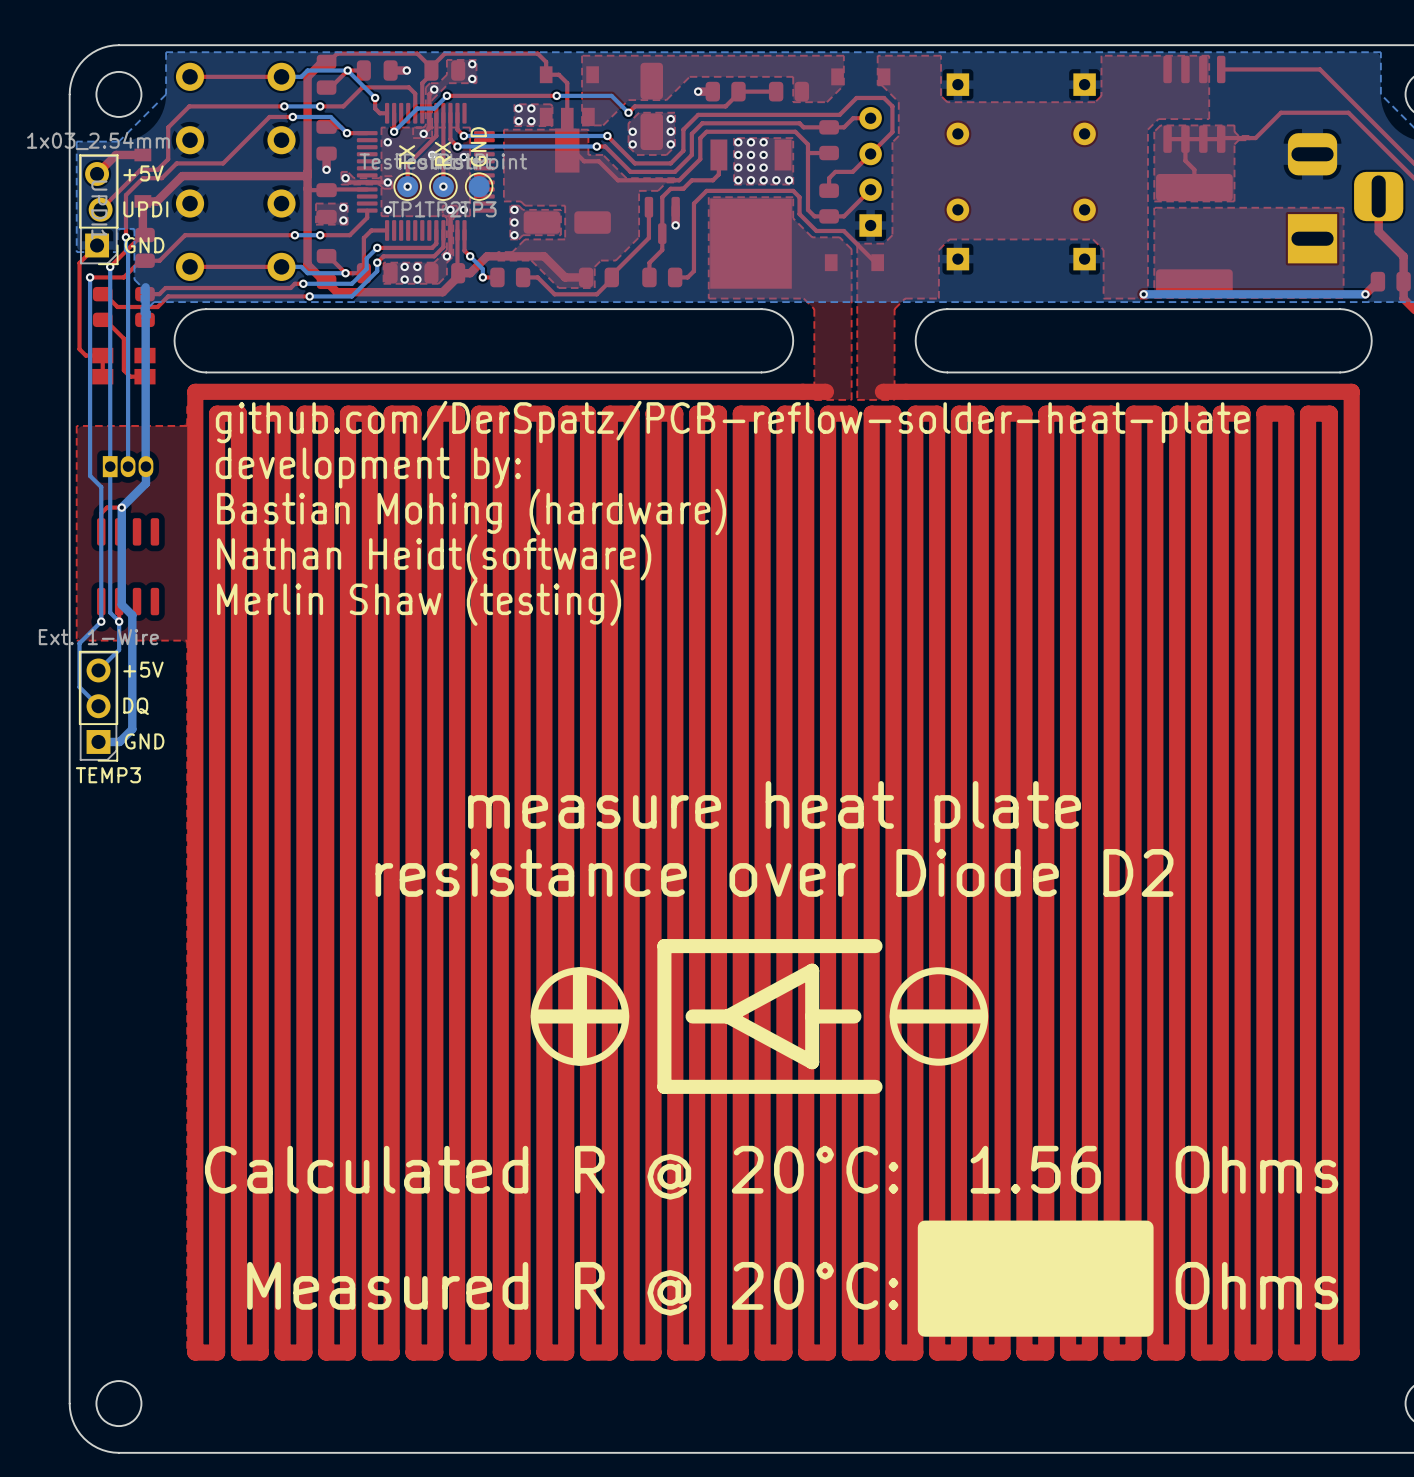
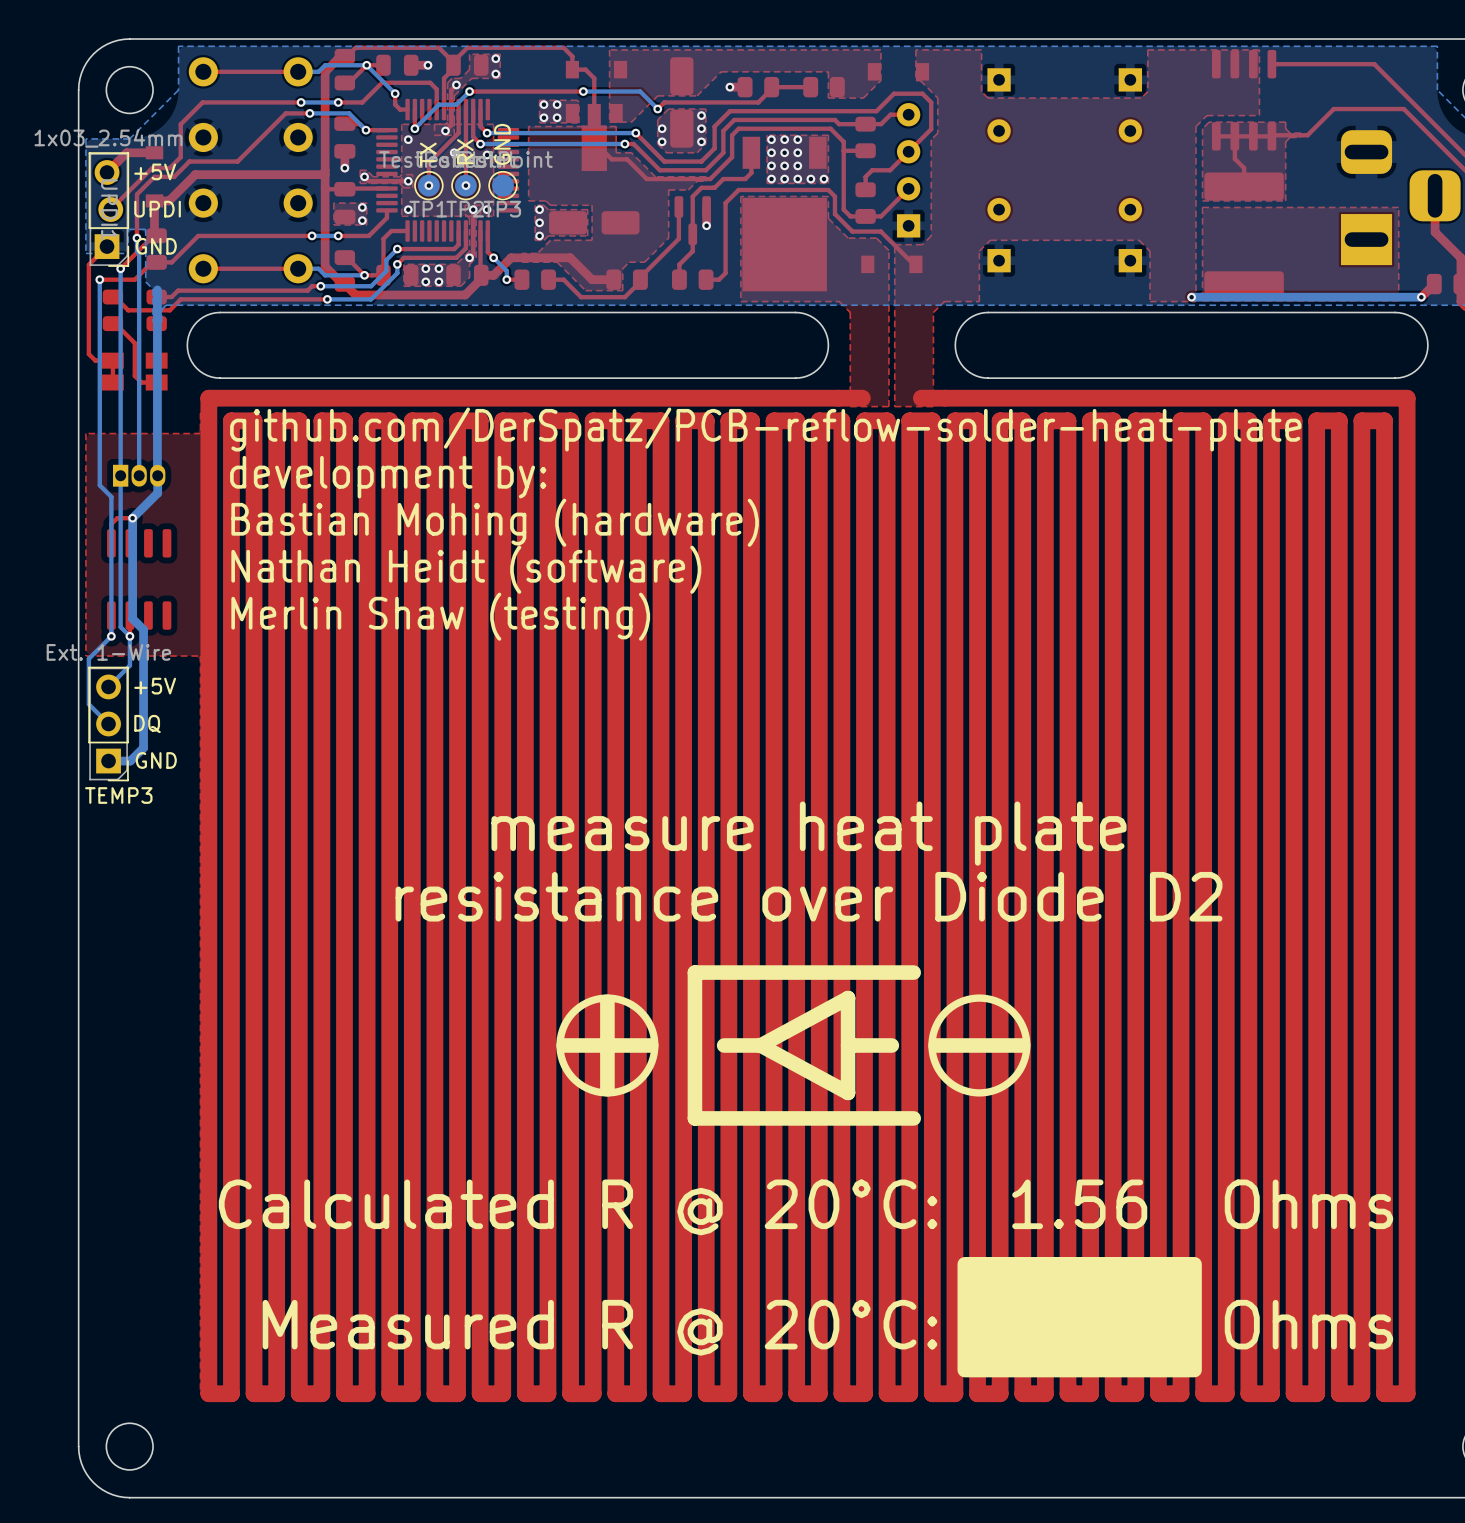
text: Nathan Heidt(software) (434, 557) -> Nathan Heidt (software) (466, 569)

